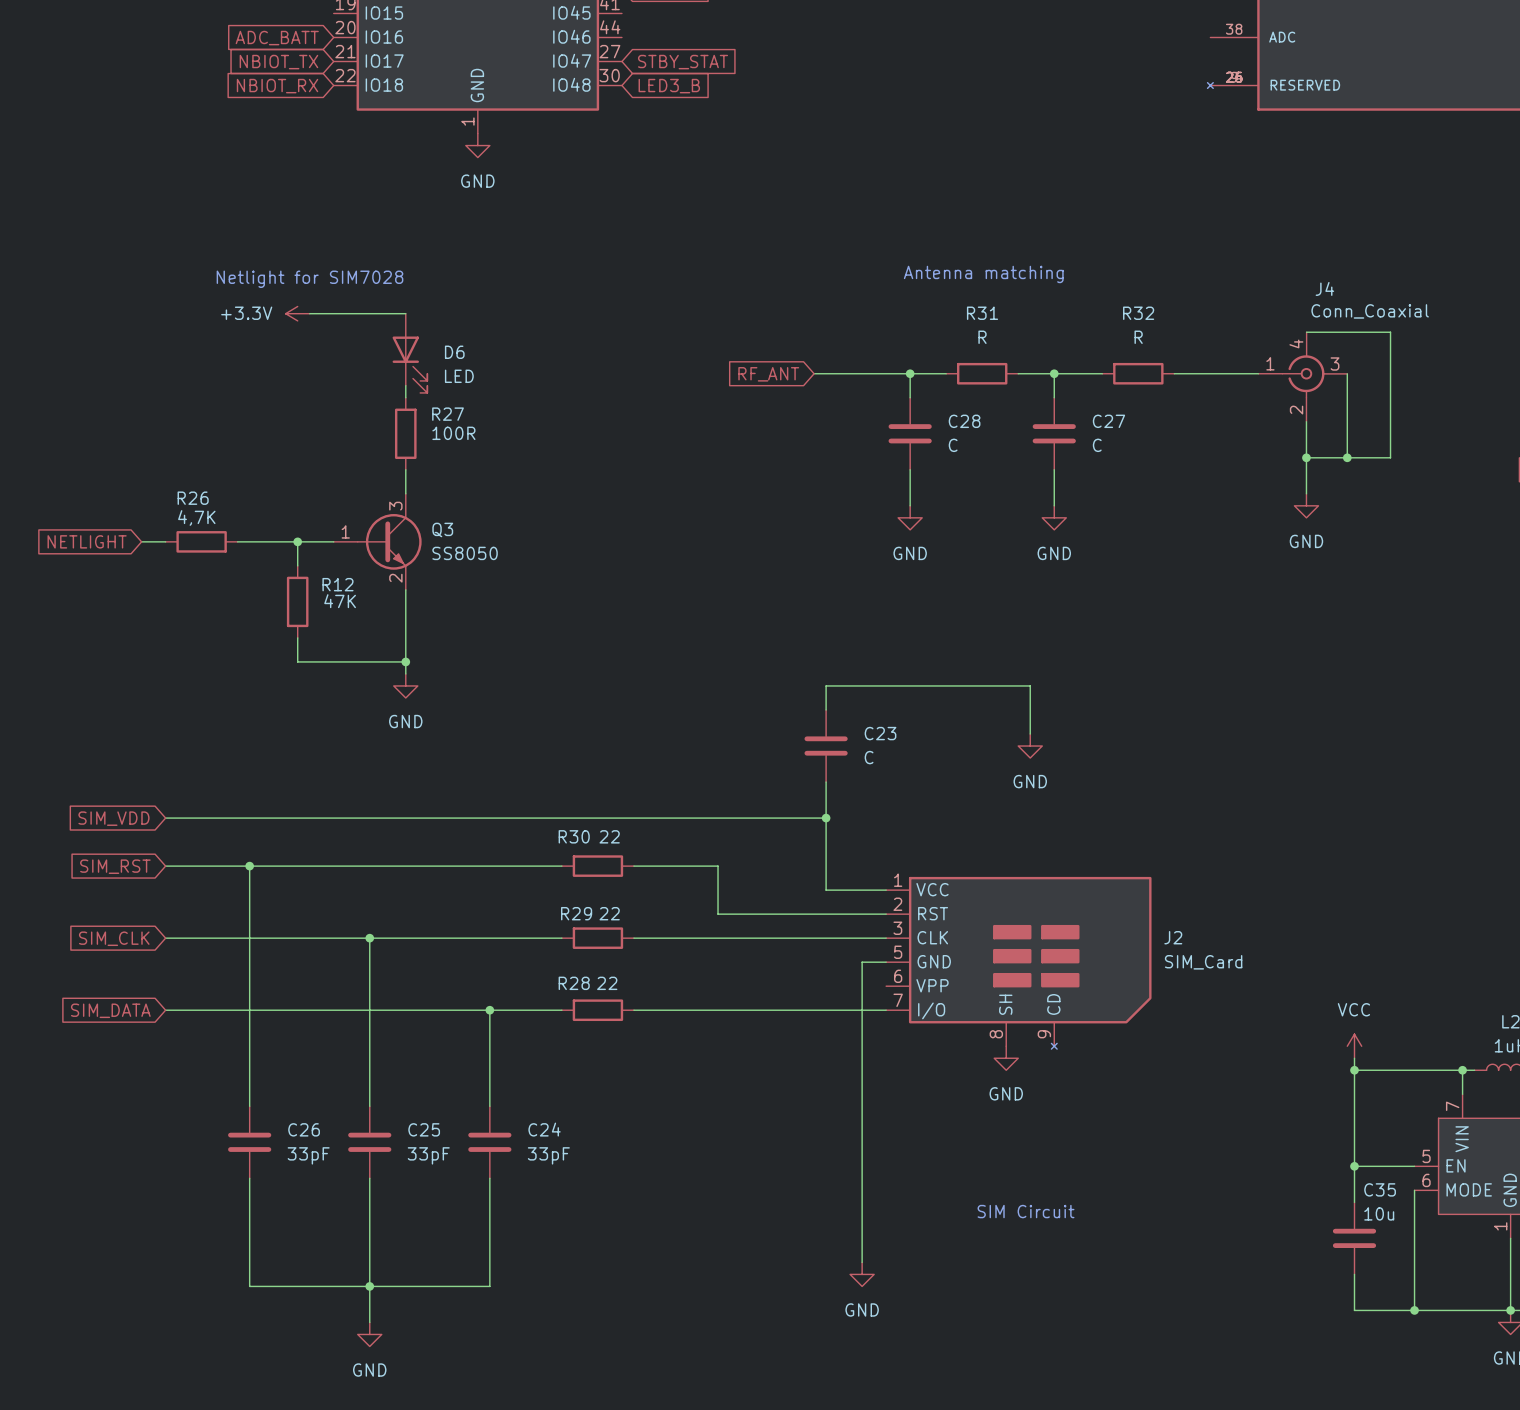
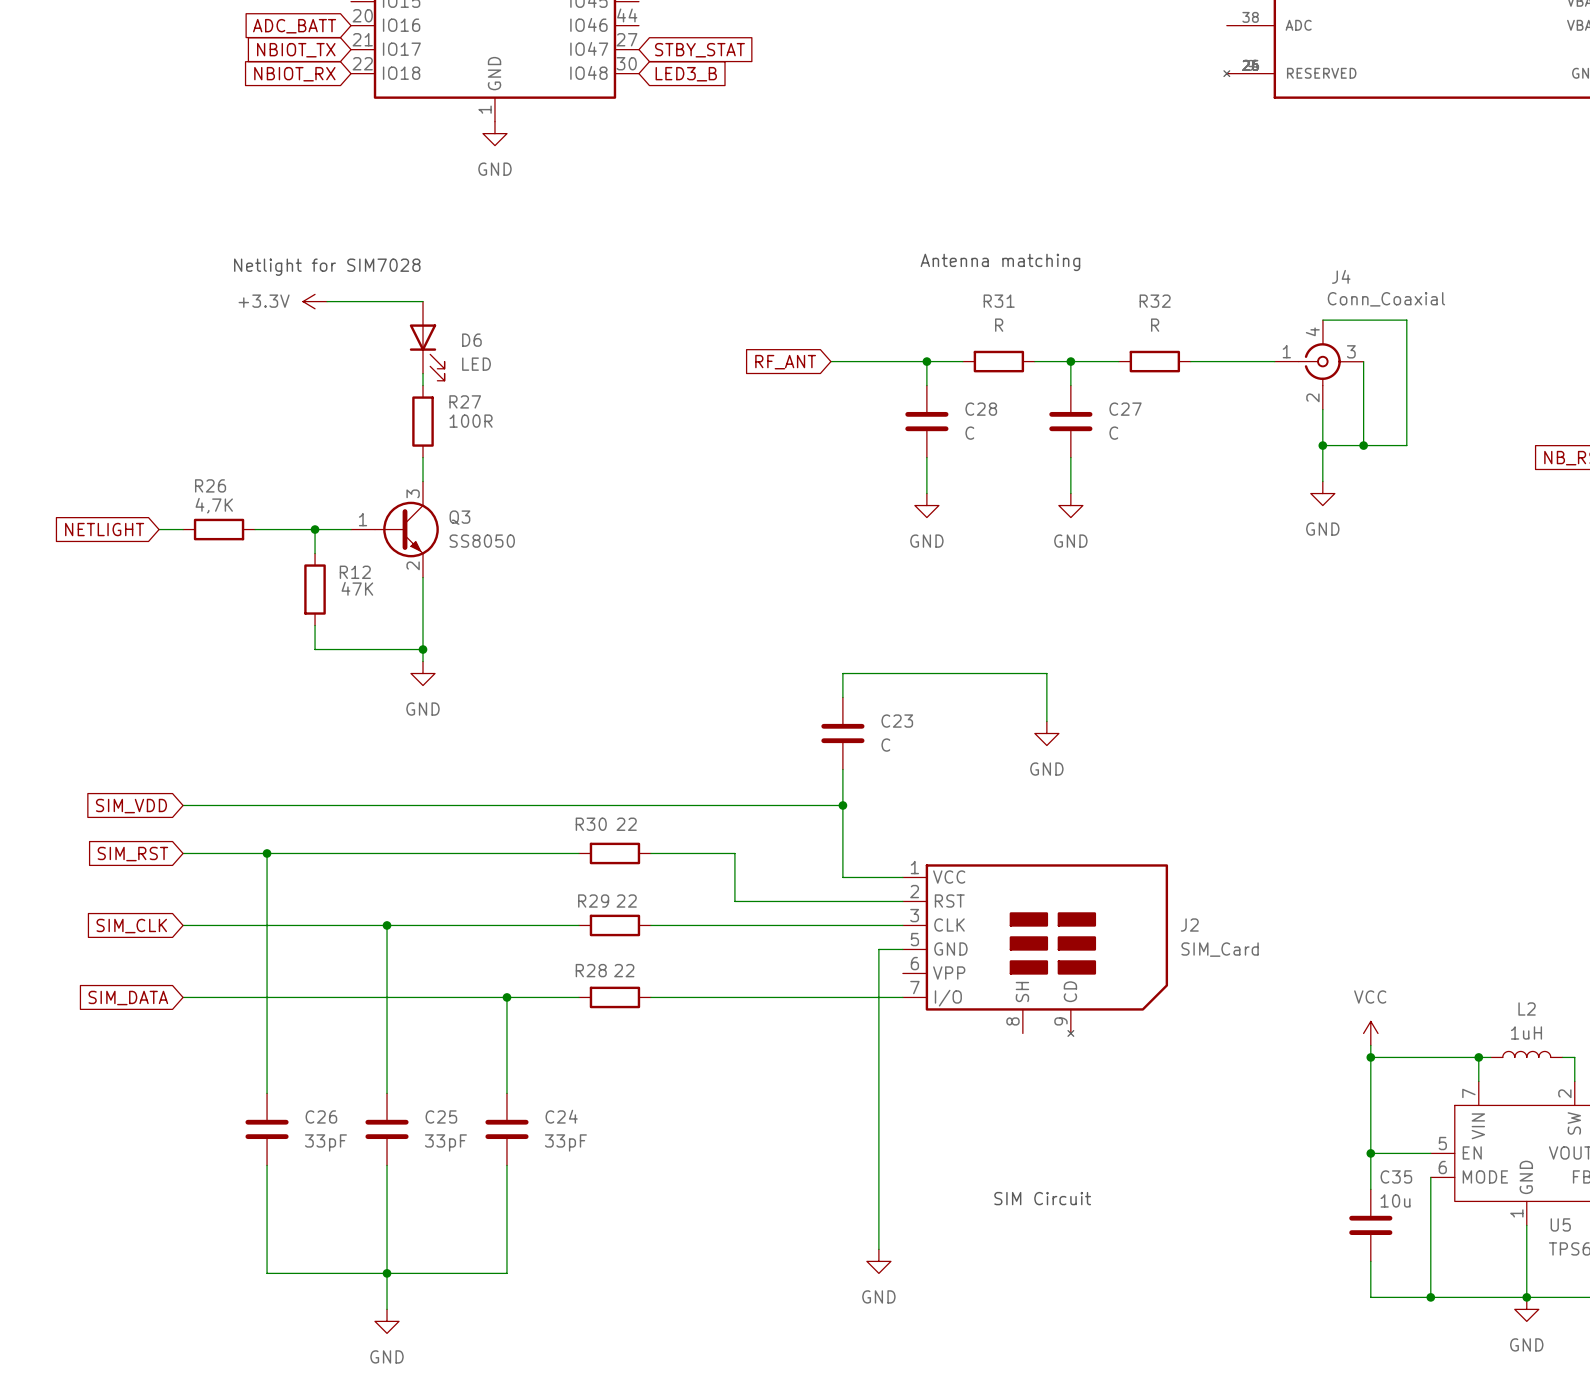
power symbol: GND (1006, 1058) -> none

